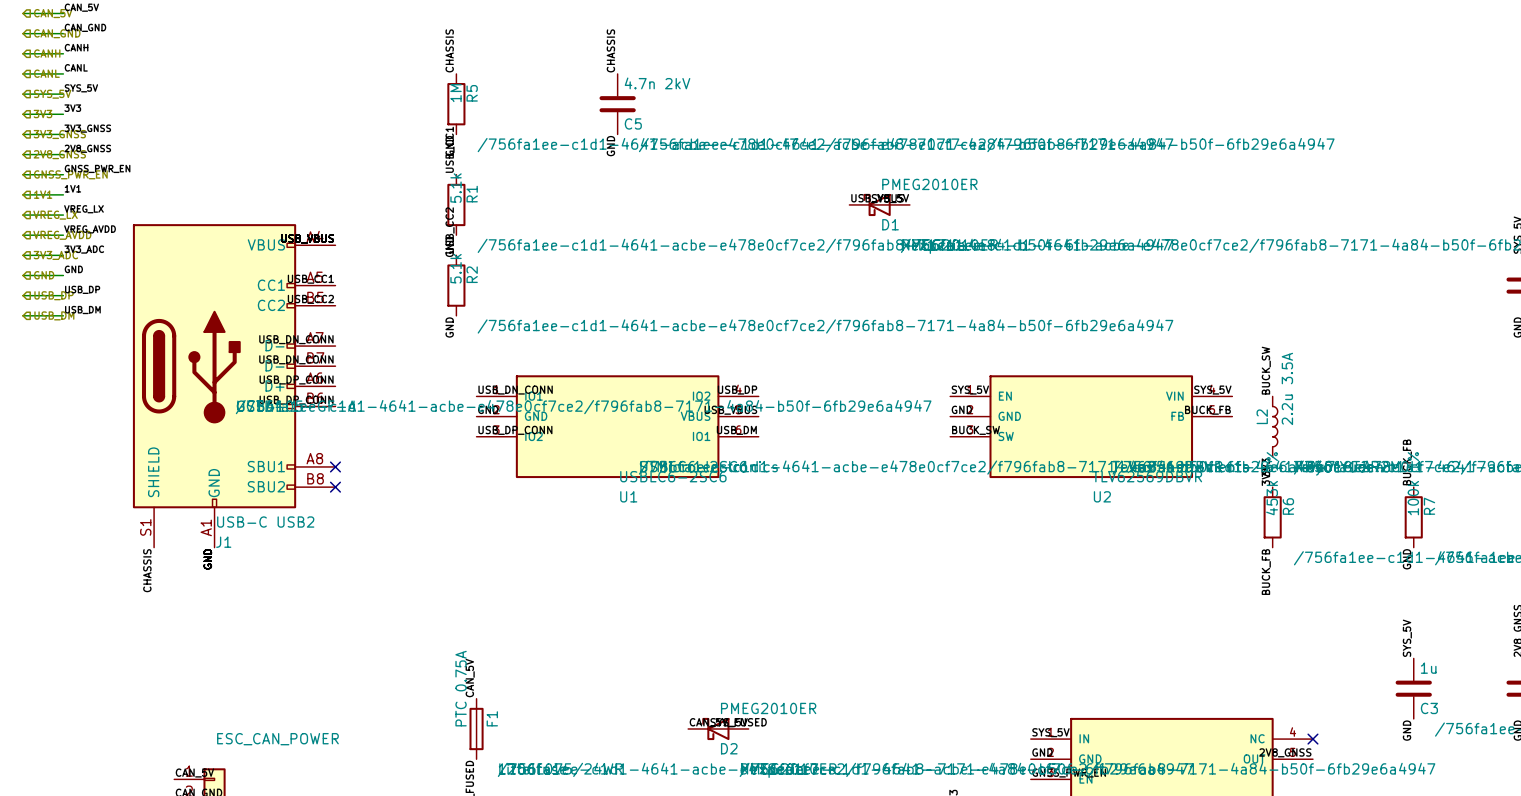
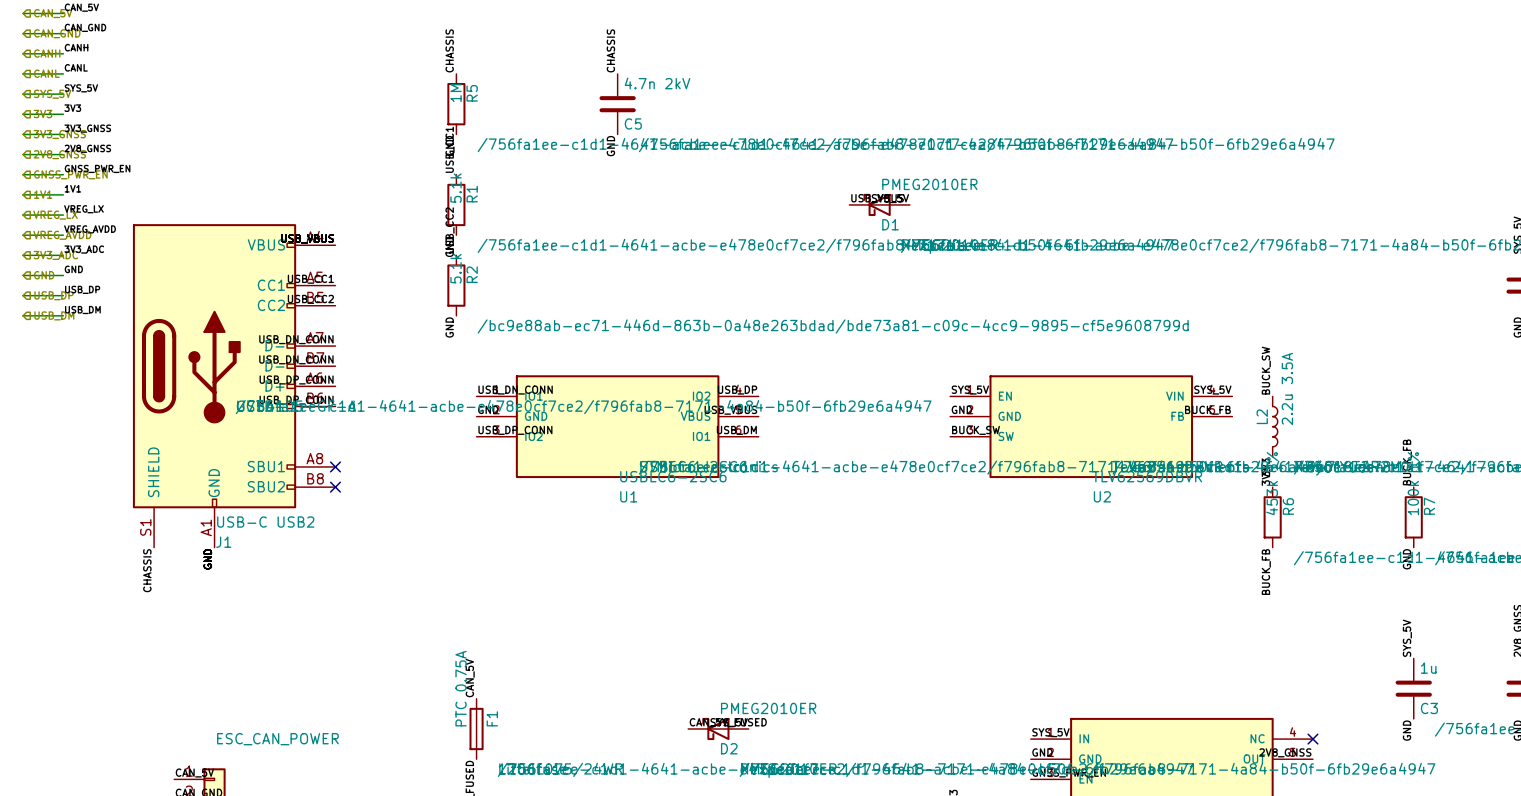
R2 text: /756fa1ee-c1d1-4641-acbe-e478e0cf7ce2/f796fab8-7171-4a84-b50f-6fb29e6a4947 (825, 326) -> /bc9e88ab-ec71-446d-863b-0a48e263bdad/bde73a81-c09c-4cc9-9895-cf5e9608799d (833, 326)

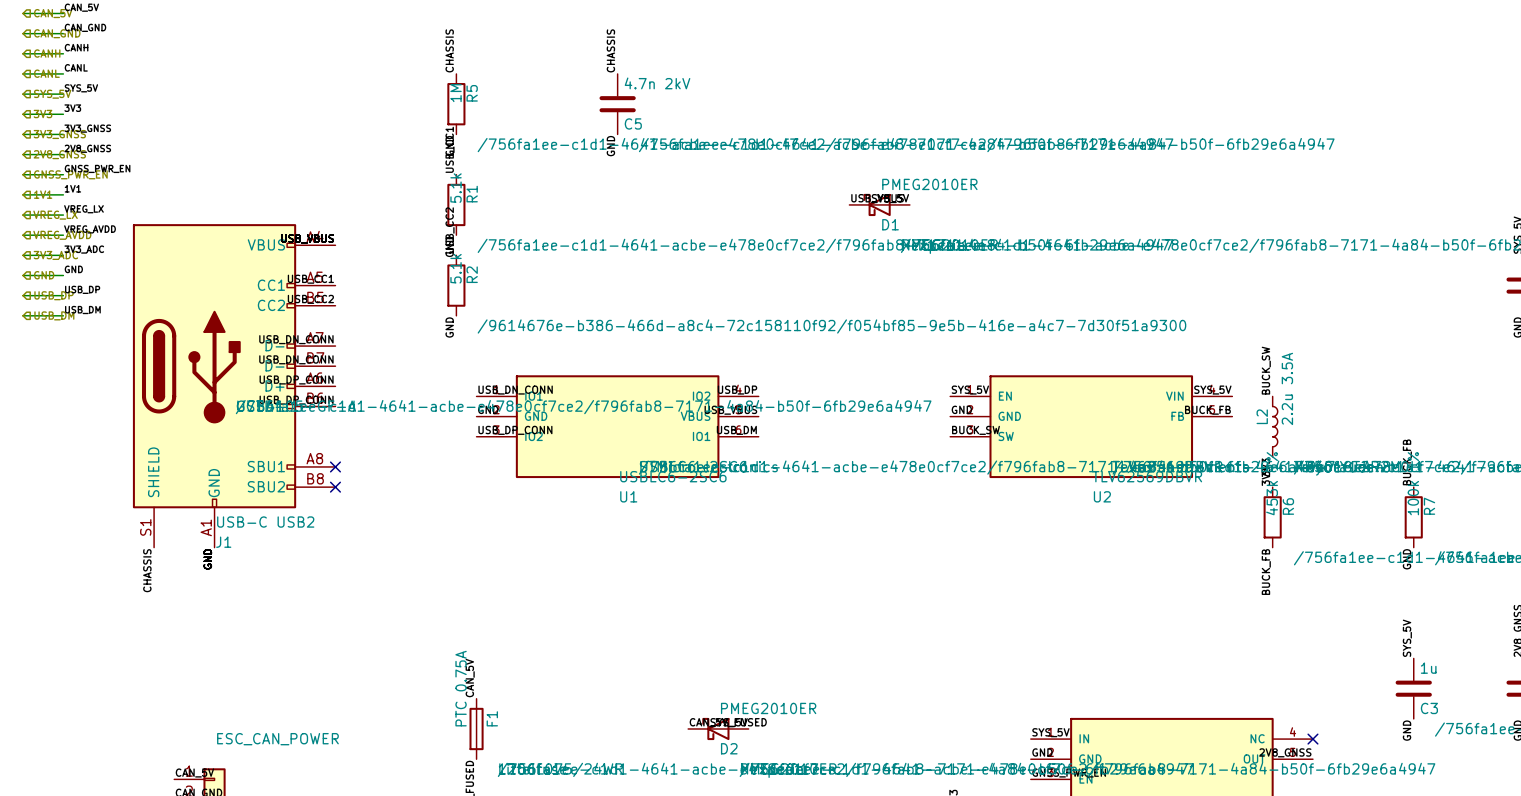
R2 text: /bc9e88ab-ec71-446d-863b-0a48e263bdad/bde73a81-c09c-4cc9-9895-cf5e9608799d (833, 326) -> /9614676e-b386-466d-a8c4-72c158110f92/f054bf85-9e5b-416e-a4c7-7d30f51a9300 (831, 326)

